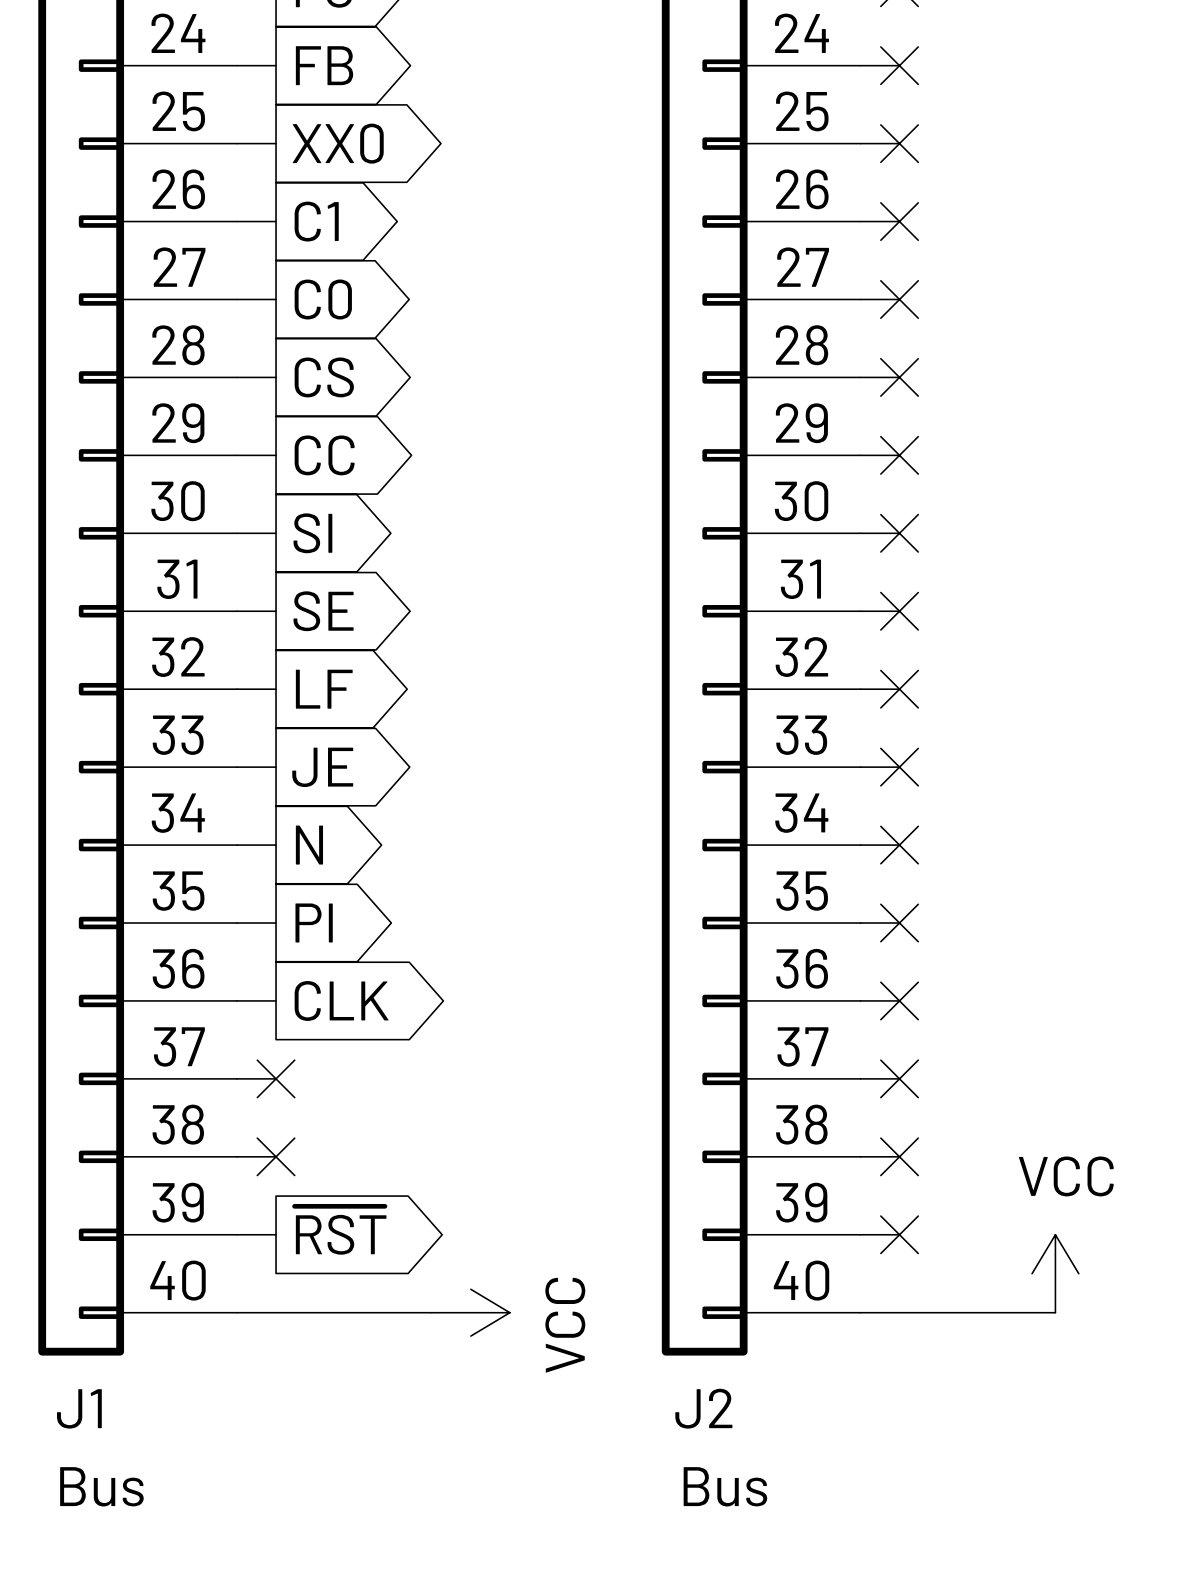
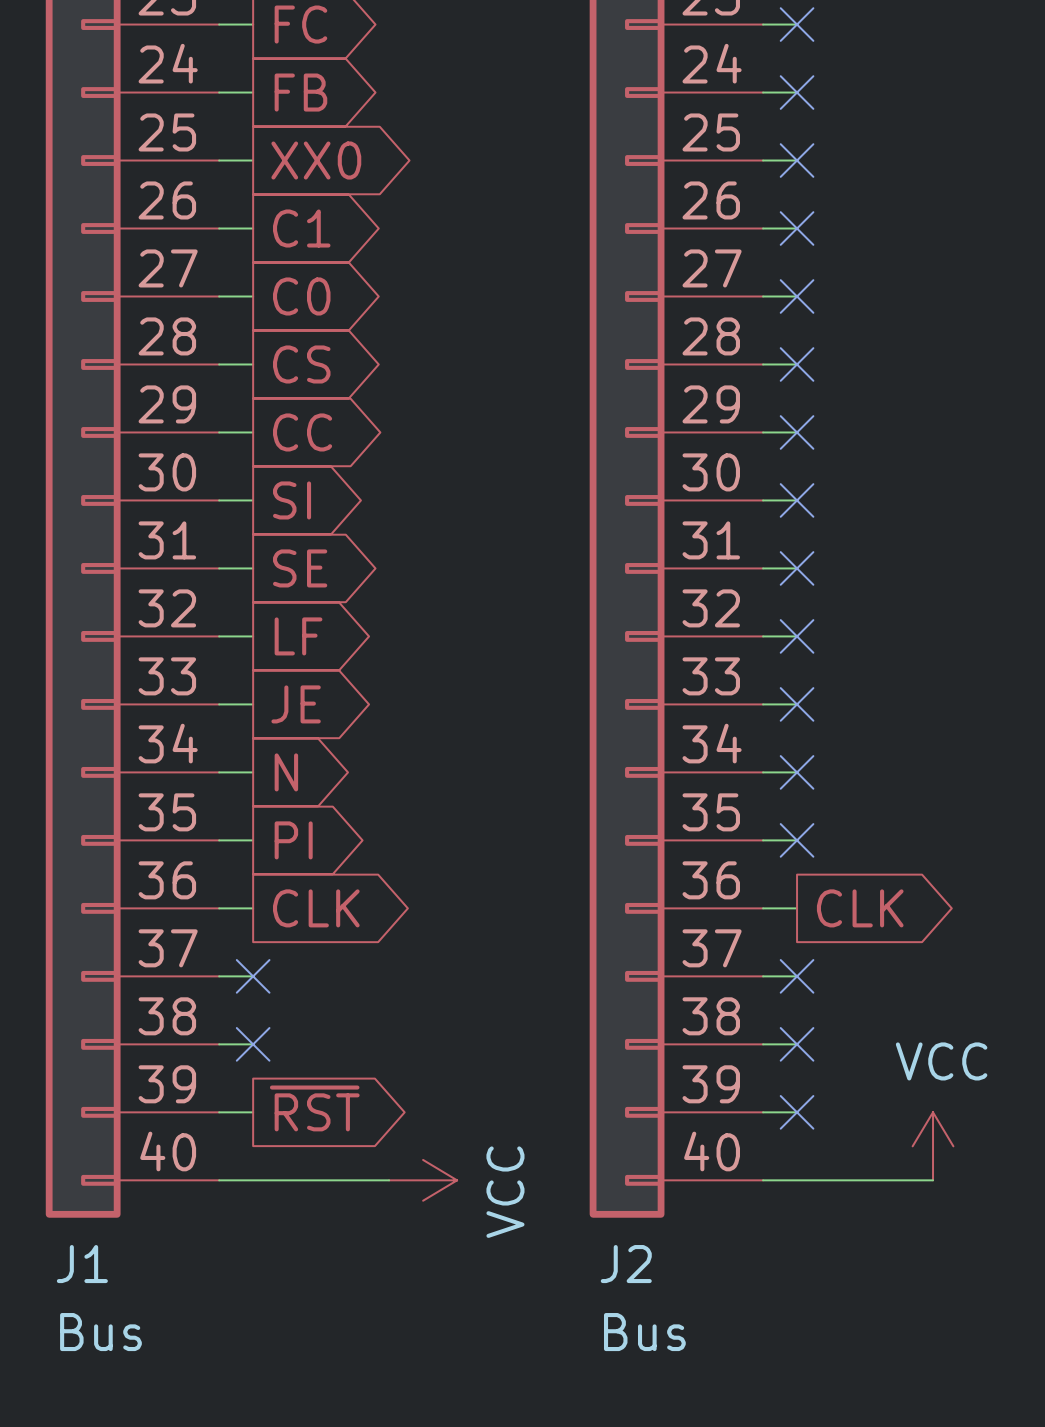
no-connect mark: (899, 1000) -> none
global label: none -> CLK (860, 908)

